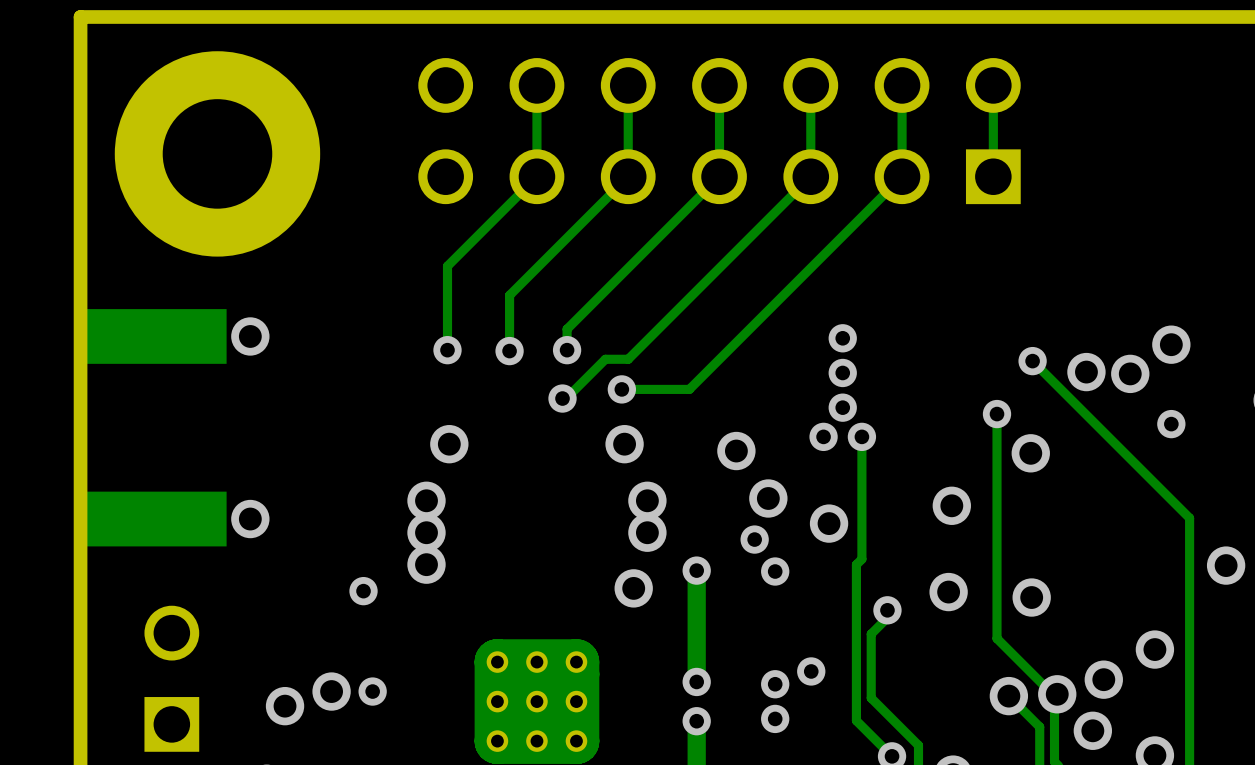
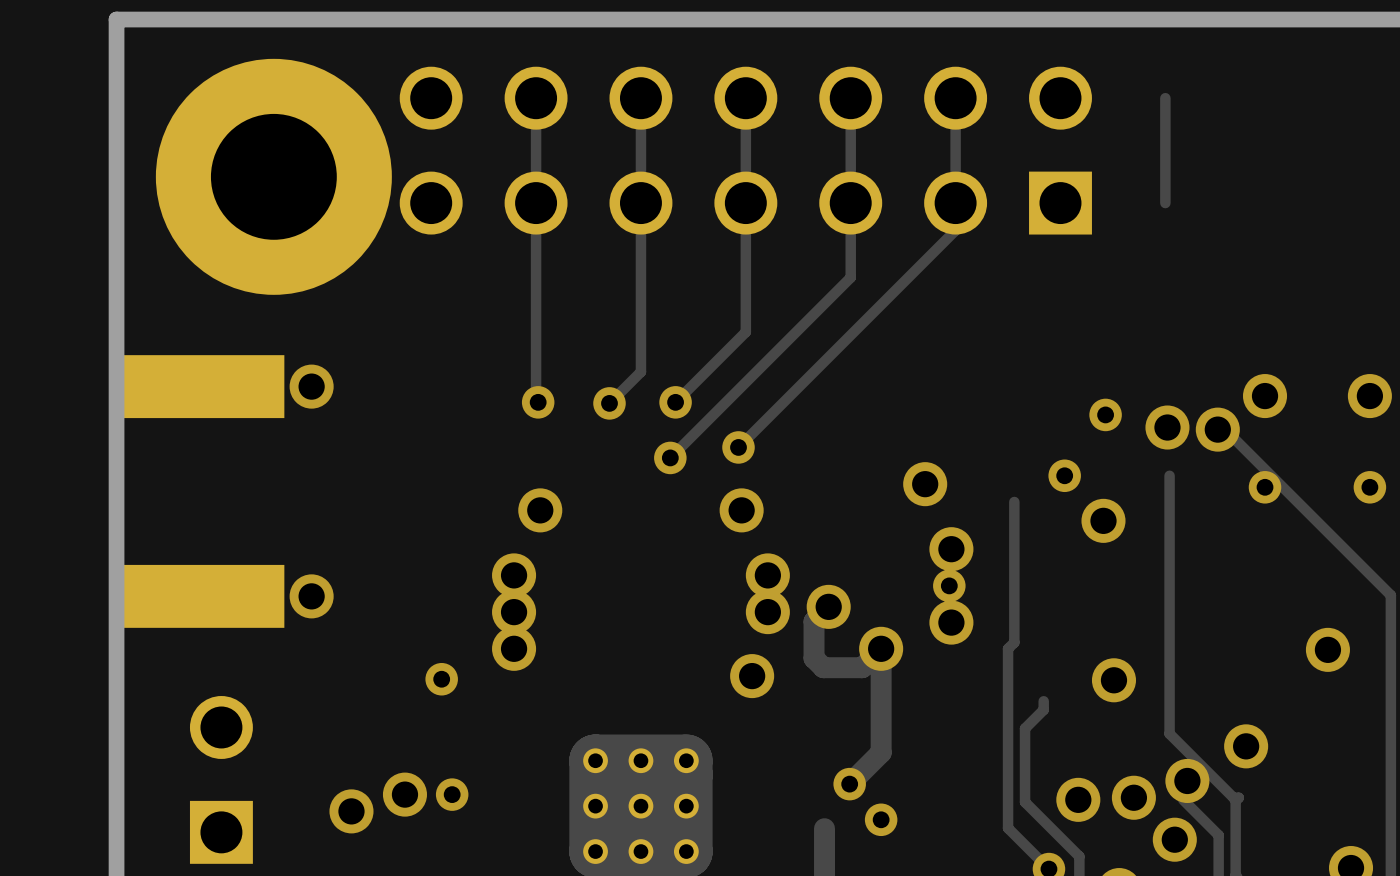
track: none -> (536, 98) (536, 400) (538, 402)
track: (902, 85) (902, 176) (689, 389) (621, 389) -> none
part position: (719, 131) -> (745, 150)
track: (536, 176) (447, 266) (447, 350) -> (640, 203) (640, 371) (609, 403)
track: (628, 176) (509, 295) (509, 351) -> (745, 203) (745, 332) (675, 402)
track: (719, 176) (567, 329) (567, 350) -> (850, 203) (850, 277) (670, 457)
track: (810, 176) (628, 359) (605, 359) (566, 398) (562, 398) -> (955, 203) (955, 230) (738, 447)
via: (842, 338) -> none
via size: [1018, 346, 1047, 376] -> [1195, 407, 1240, 452]
via: none -> (1105, 414)
via: (842, 372) -> none
via: none -> (1167, 427)
via position: (1086, 372) -> (1265, 396)
via: (1130, 373) -> none
via: (842, 407) -> none
via: none -> (1064, 475)
via: (997, 414) -> none
via: none -> (925, 484)
via: none -> (1265, 487)
via: (823, 436) -> none
via: (861, 436) -> none
via: (736, 451) -> none
via: none -> (1103, 520)
via: (1030, 453) -> none
via: none -> (951, 549)
via: (768, 498) -> none
via: (951, 505) -> none
via: none -> (949, 585)
via: (829, 523) -> none
track: none -> (828, 606) (814, 621) (814, 658) (823, 667) (862, 667) (881, 648) (881, 752) (849, 784)
via: none -> (828, 606)
via: (754, 539) -> none
via: none -> (951, 622)
via: none -> (881, 648)
via: none -> (1327, 649)
track: (696, 570) (696, 681) -> none
via: (696, 570) -> none
via: (775, 571) -> none
via: (1031, 597) -> none
via: (887, 610) -> none
via: none -> (1246, 746)
via: (1154, 649) -> none
via: (811, 671) -> none
via: (1103, 679) -> none
via position: (696, 681) -> (849, 784)
via: (775, 684) -> none
via: none -> (1133, 797)
via: (1057, 694) -> none
via: none -> (1078, 799)
via position: (1008, 696) -> (1187, 780)
via: none -> (881, 819)
via: (775, 718) -> none
via: (696, 721) -> none
via: none -> (1174, 839)
via: (1092, 730) -> none

